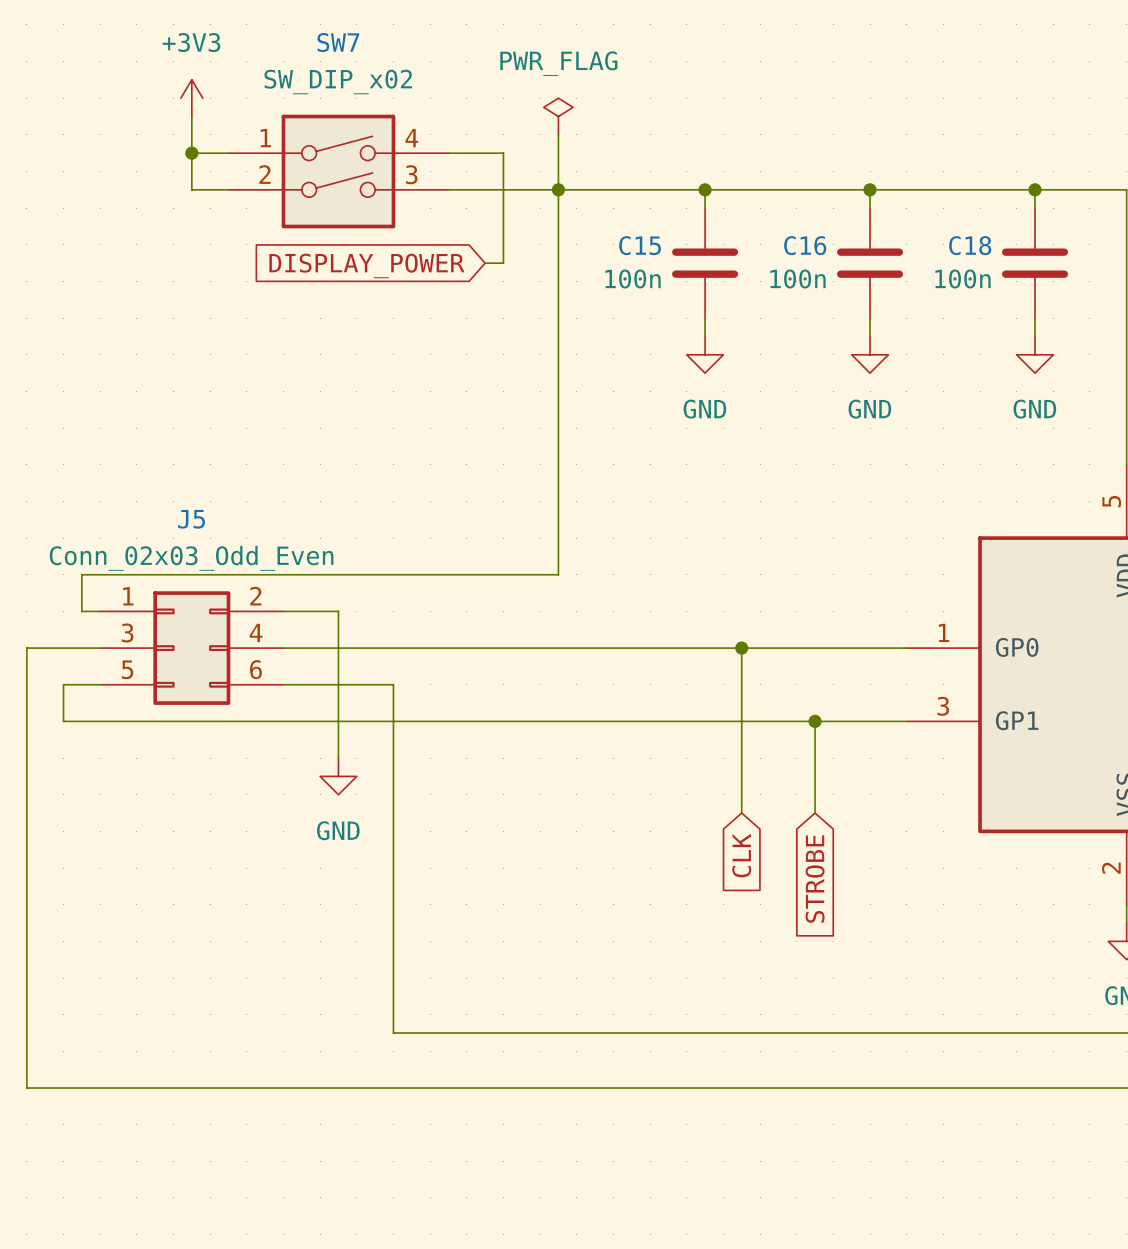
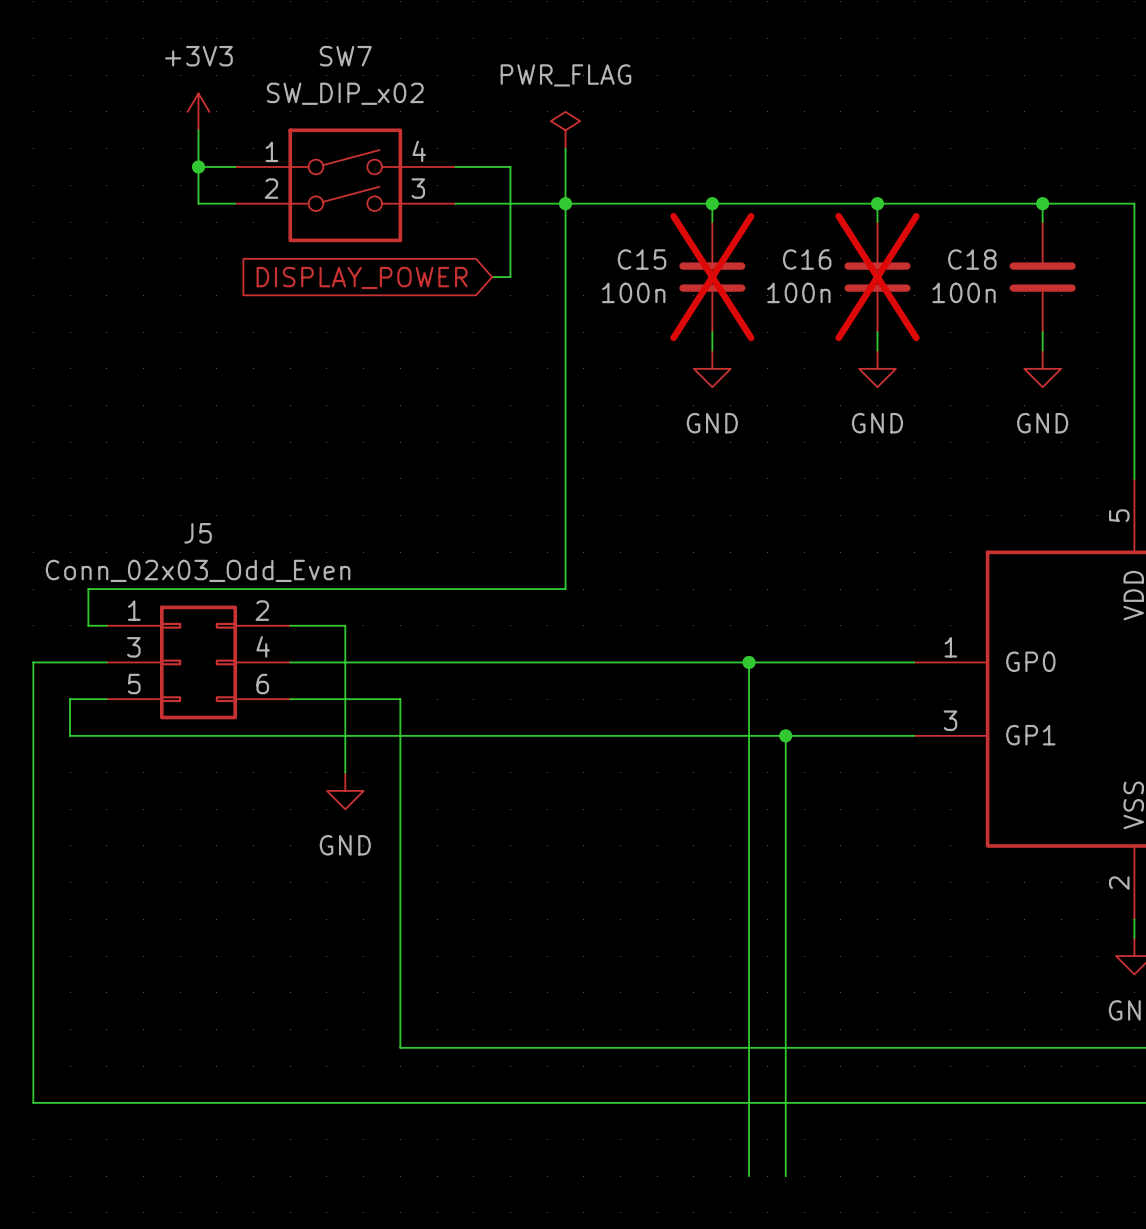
C15 do-not-place cross: none -> (712, 277)
C16 do-not-place cross: none -> (877, 277)
wire: none -> (785, 735) (785, 1176)
wire: (815, 721) (815, 813) -> none
junction position: (815, 721) -> (785, 735)
wire: none -> (749, 827) (749, 1176)
global label: CLK (741, 855) -> none
global label: STROBE (815, 879) -> none

